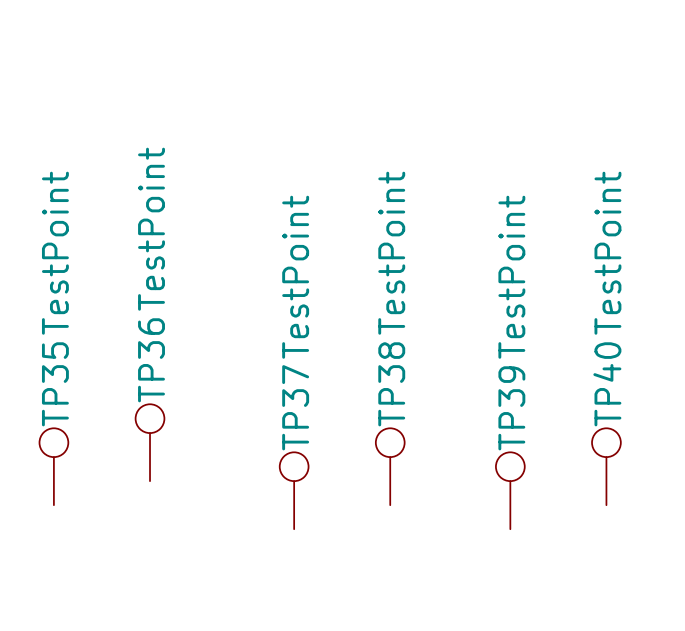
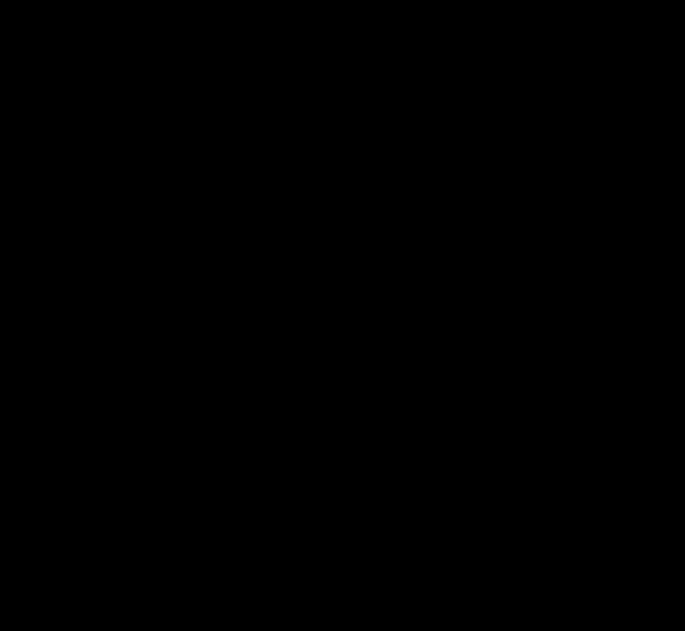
TP36: TestPoint (150, 442) -> none
TP35: TestPoint (53, 466) -> none
TP38: TestPoint (390, 466) -> none
TP40: TestPoint (606, 466) -> none
TP37: TestPoint (294, 490) -> none
TP39: TestPoint (510, 490) -> none

